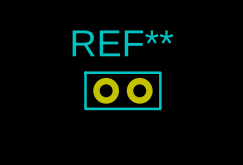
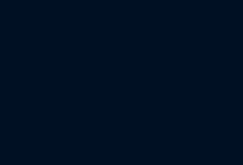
REF**: (122, 90) -> none

